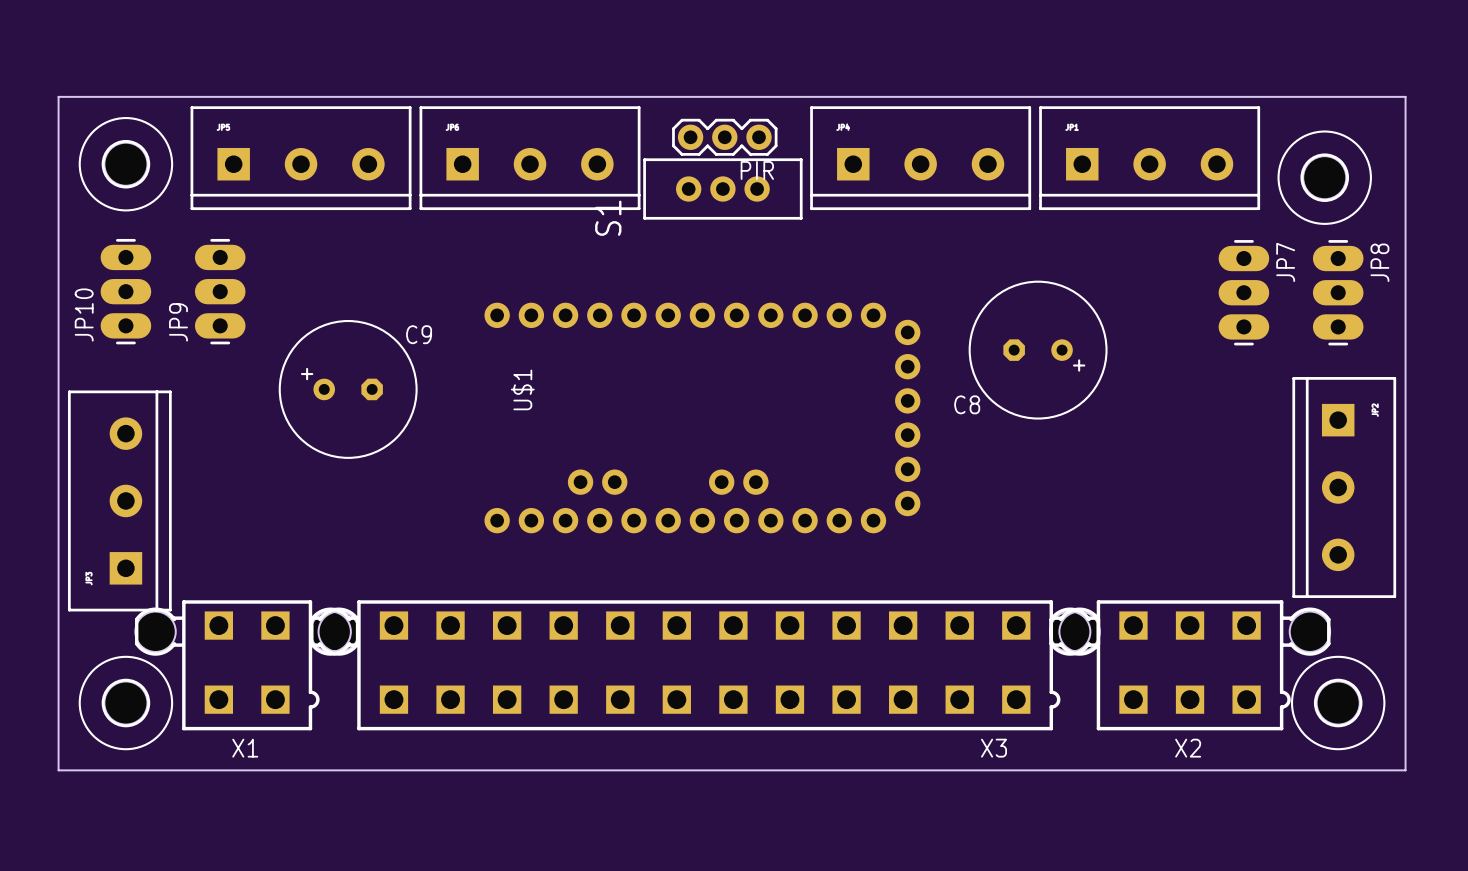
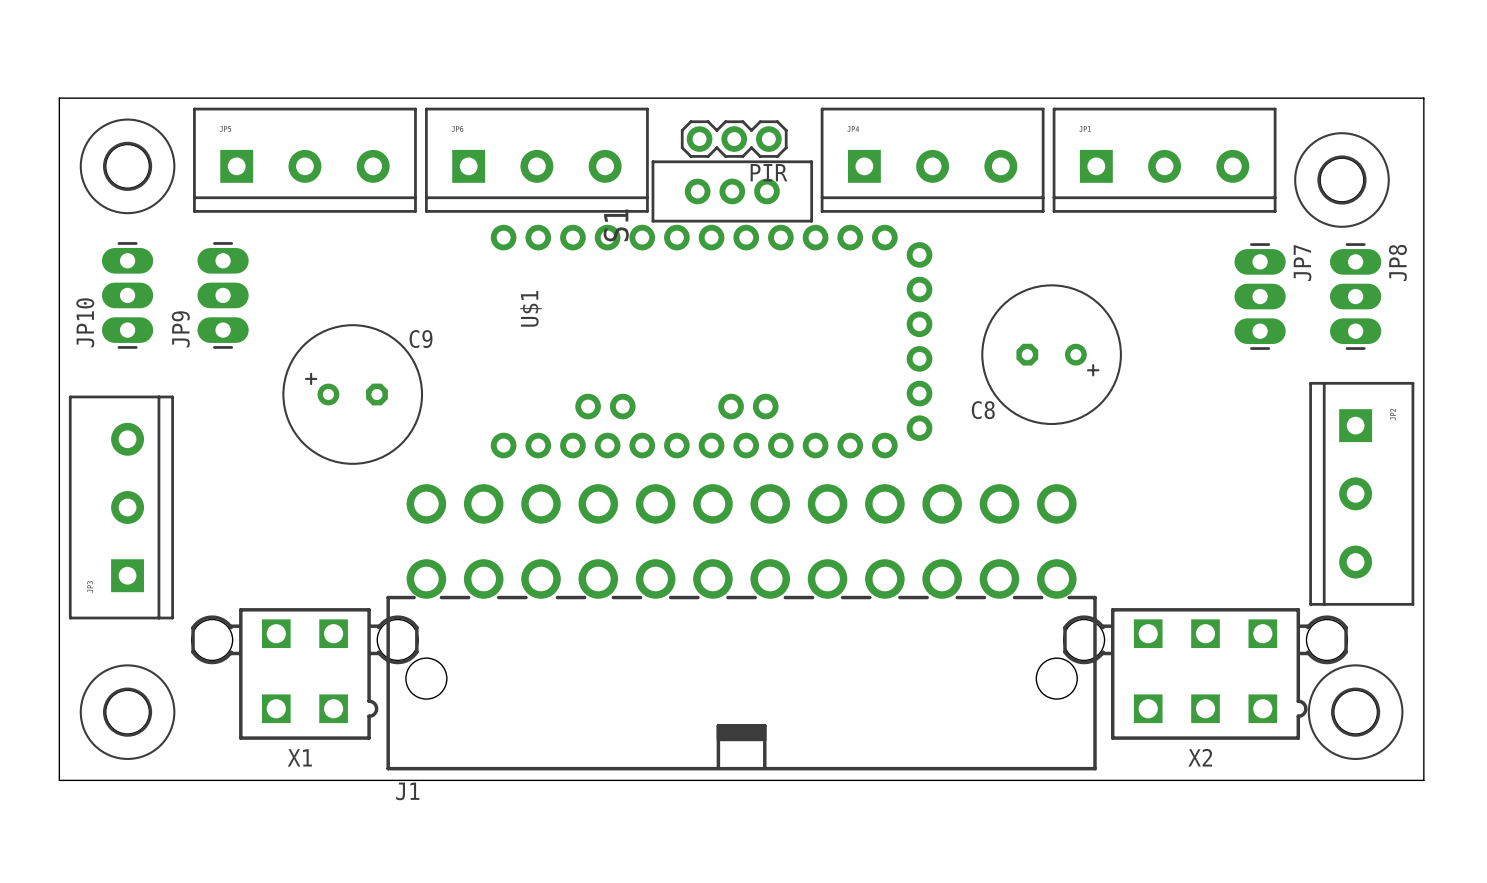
U$1 position: (702, 418) -> (711, 341)
J1: none -> (741, 627)
X1 position: (247, 665) -> (304, 673)
X3: (705, 665) -> none

